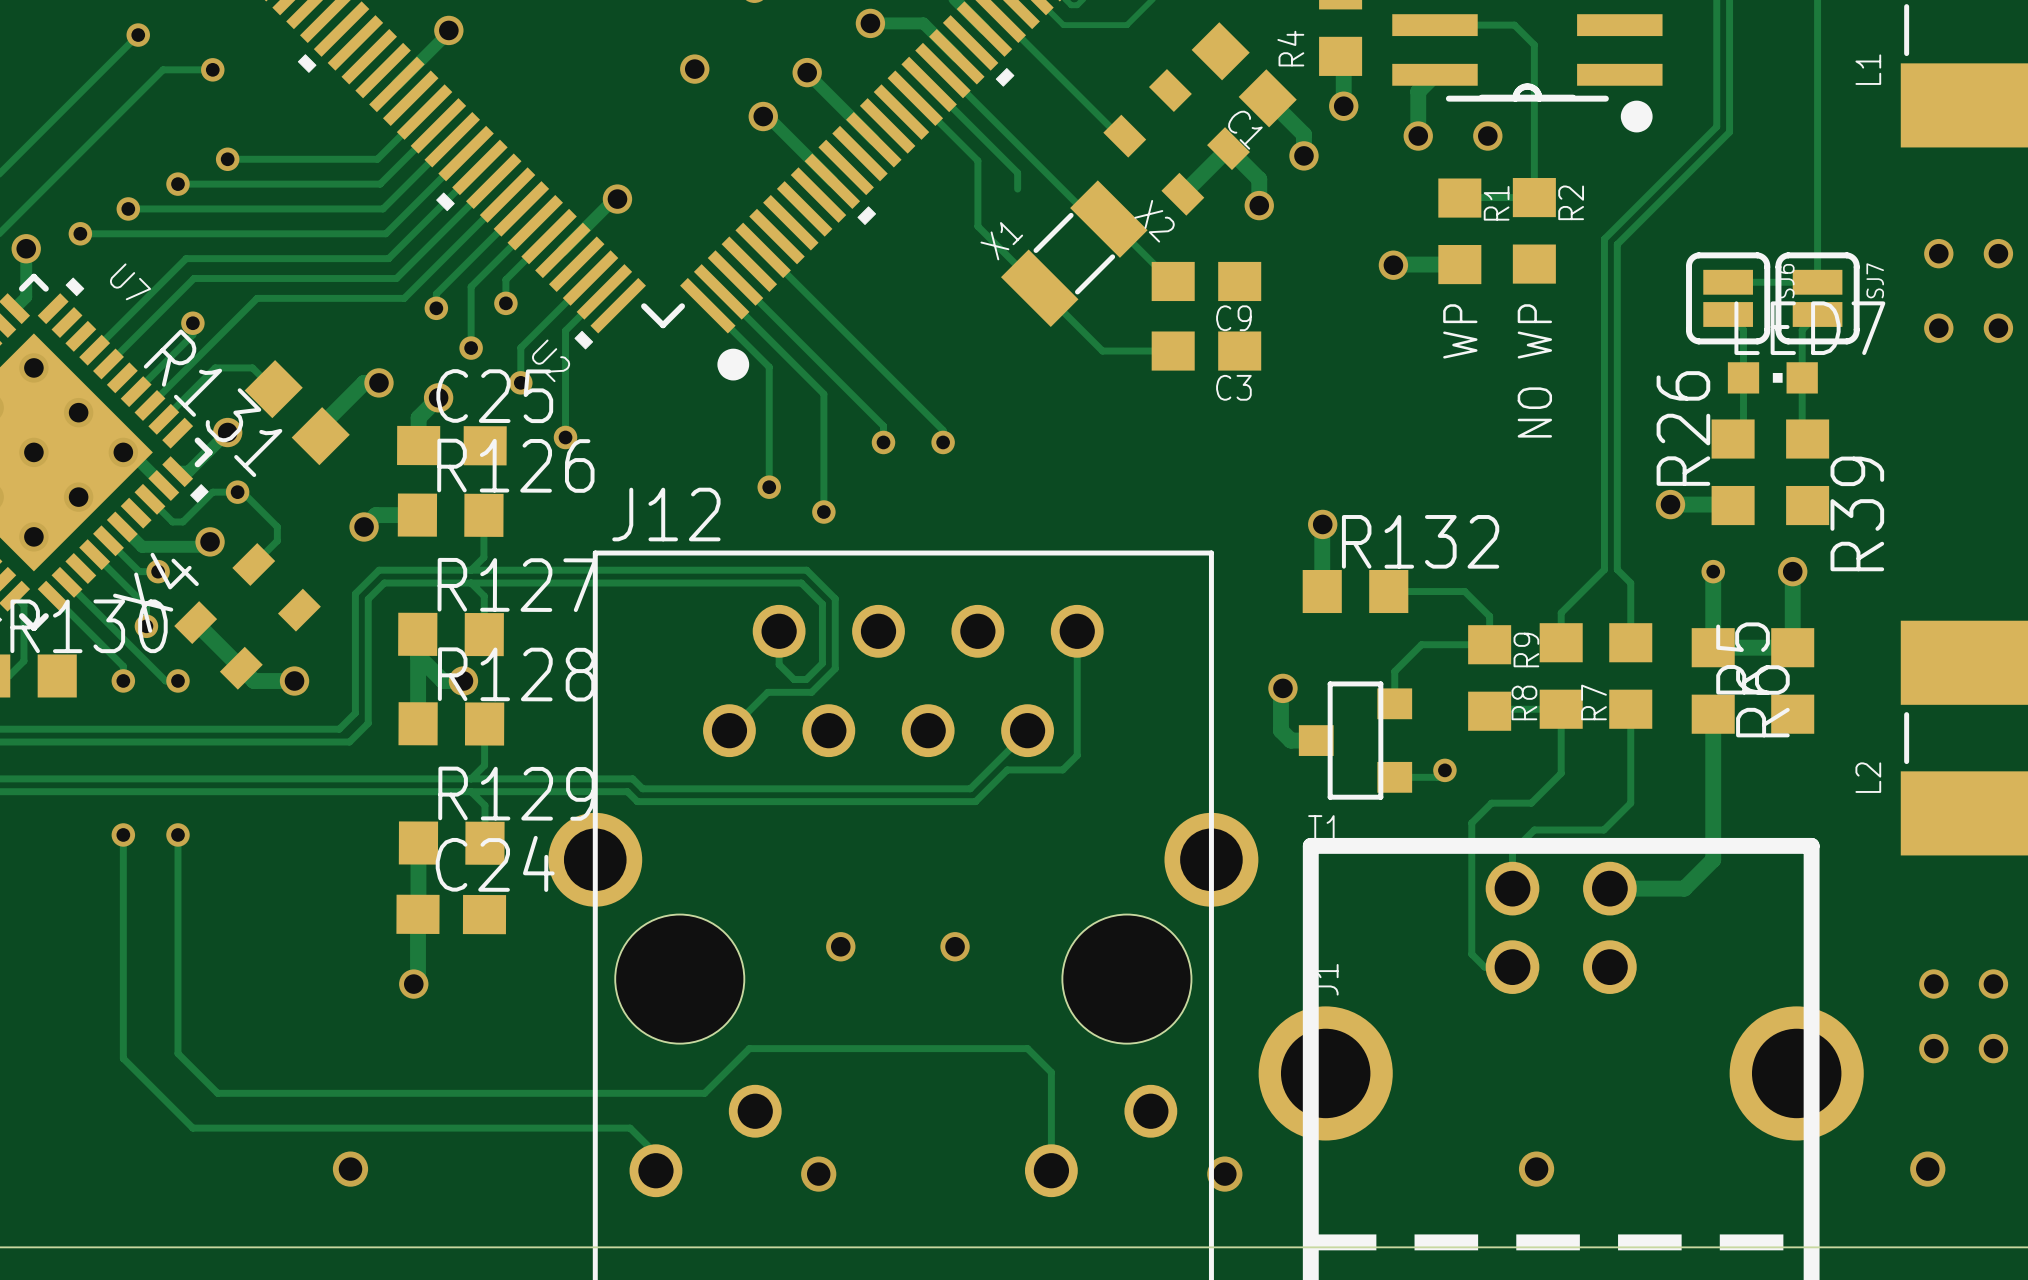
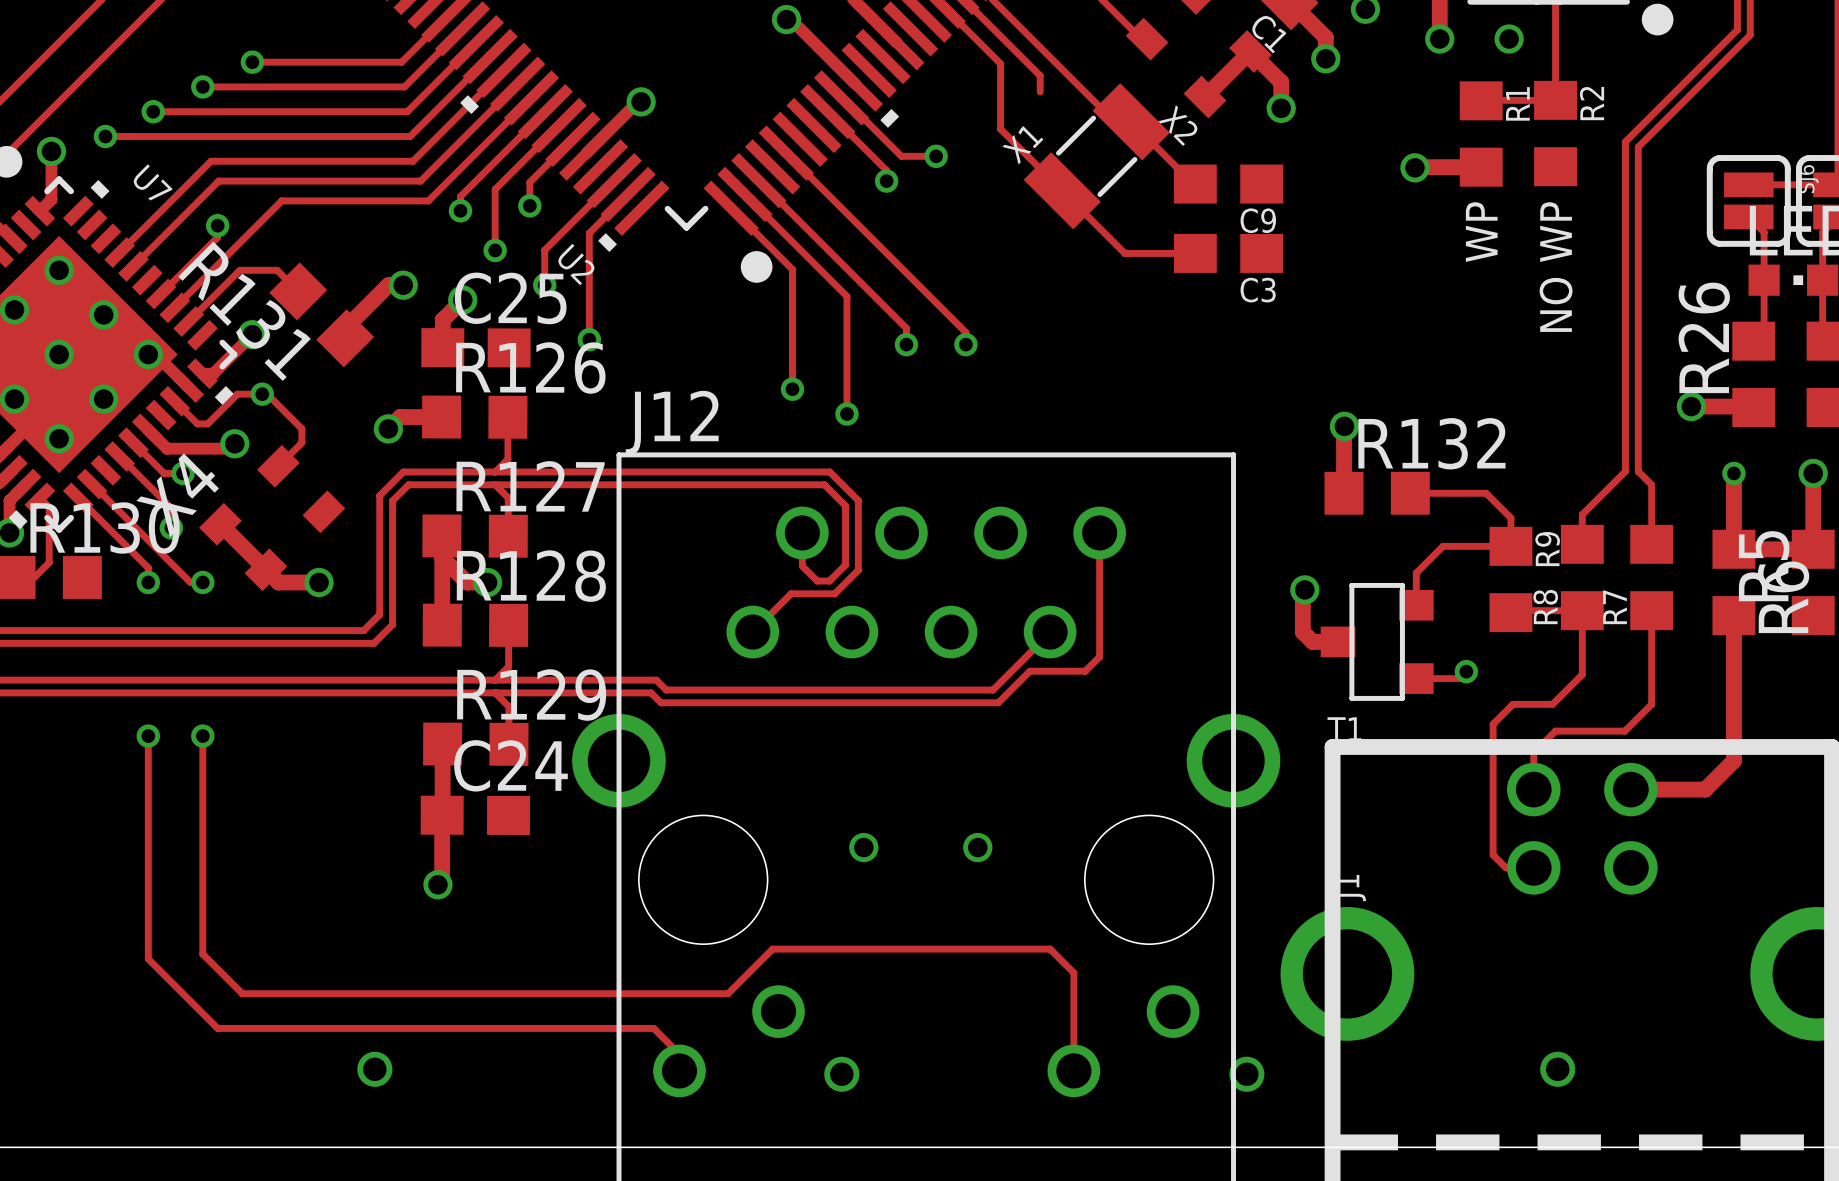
track: none -> (841, 97) (901, 156) (936, 156)
track: none -> (827, 111) (886, 170) (886, 181)
via: none -> (936, 156)
via: none -> (886, 181)

